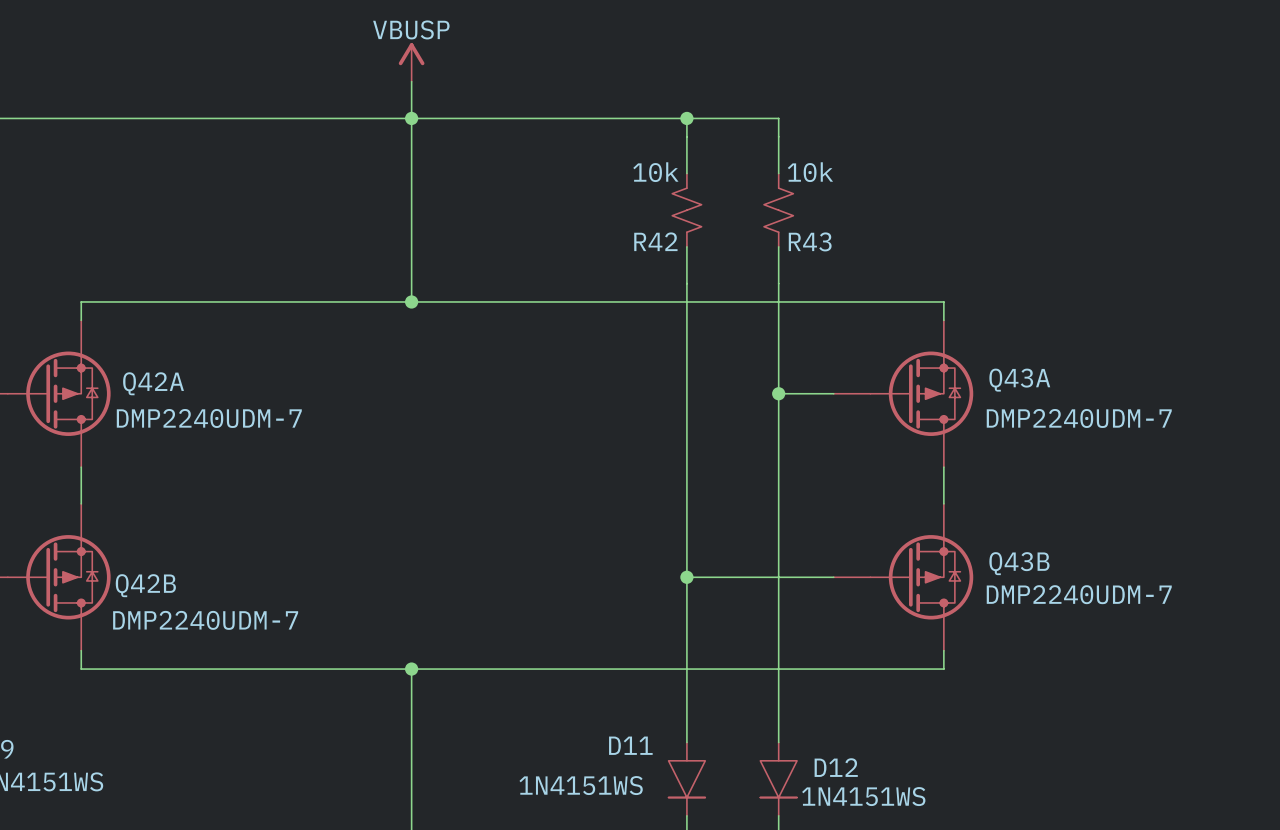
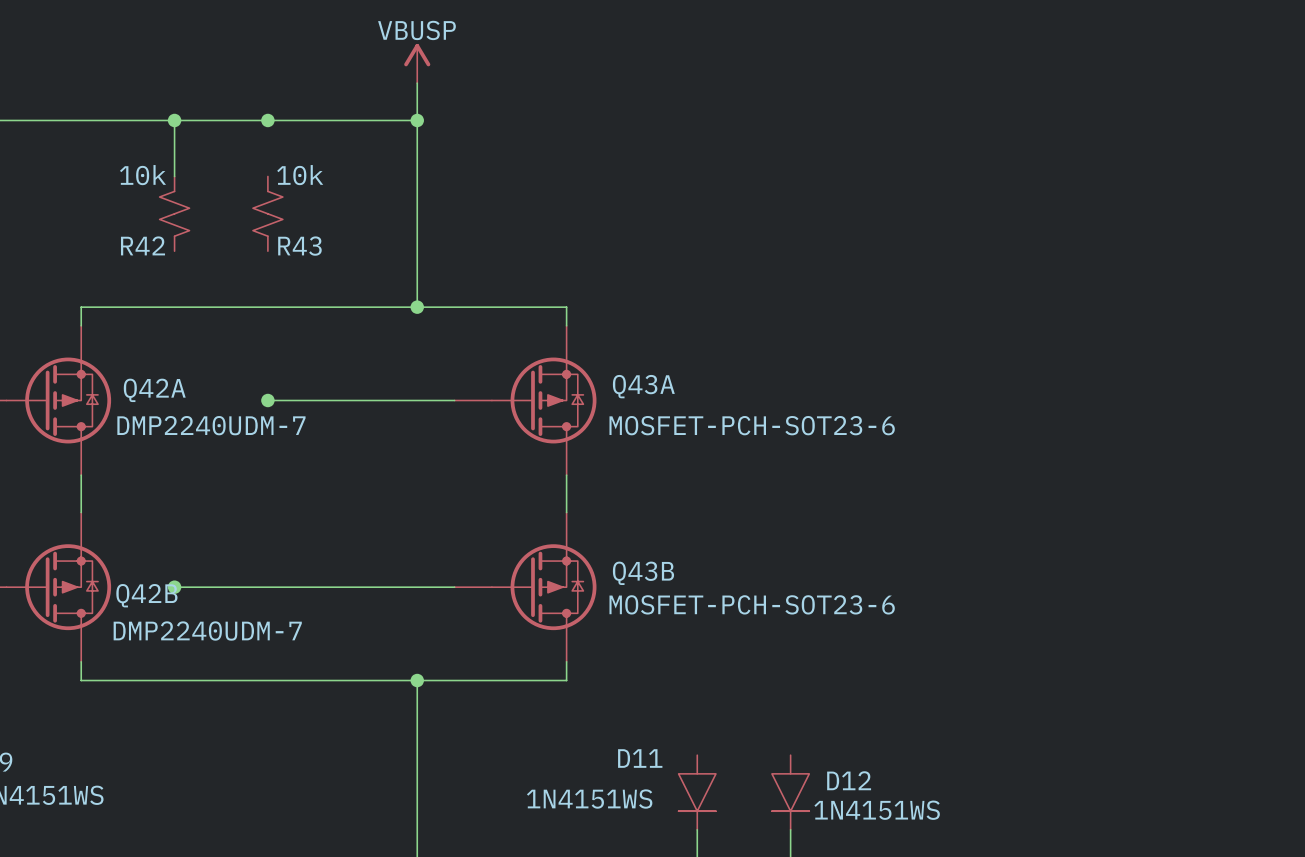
wire: none -> (174, 120) (174, 176)
junction: none -> (174, 120)
junction: none -> (267, 120)
wire: (411, 118) (778, 118) (778, 173) -> none
wire: (686, 118) (686, 173) -> none
junction: (686, 118) -> none
R42 position: (686, 210) -> (174, 213)
R43 position: (778, 210) -> (267, 213)
wire: (686, 246) (686, 742) -> none
wire: (778, 246) (778, 742) -> none
wire: (558, 301) (943, 301) (943, 320) -> (566, 307) (566, 325)
wire: none -> (267, 400) (454, 400)
junction: none -> (267, 400)
wire: (778, 393) (833, 393) -> none
junction: (778, 393) -> none
Q43A position: (903, 393) -> (525, 400)
Q43A value: DMP2240UDM-7 (1079, 418) -> MOSFET-PCH-SOT23-6 (752, 425)
wire: none -> (566, 475) (566, 512)
wire: (943, 467) (943, 503) -> none
wire: none -> (174, 587) (454, 587)
junction: none -> (174, 587)
wire: (686, 577) (833, 577) -> none
junction: (686, 577) -> none
Q43B position: (903, 577) -> (525, 587)
Q43B value: DMP2240UDM-7 (1079, 594) -> MOSFET-PCH-SOT23-6 (752, 604)
wire: (943, 650) (943, 669) (558, 669) -> (566, 661) (566, 680)

